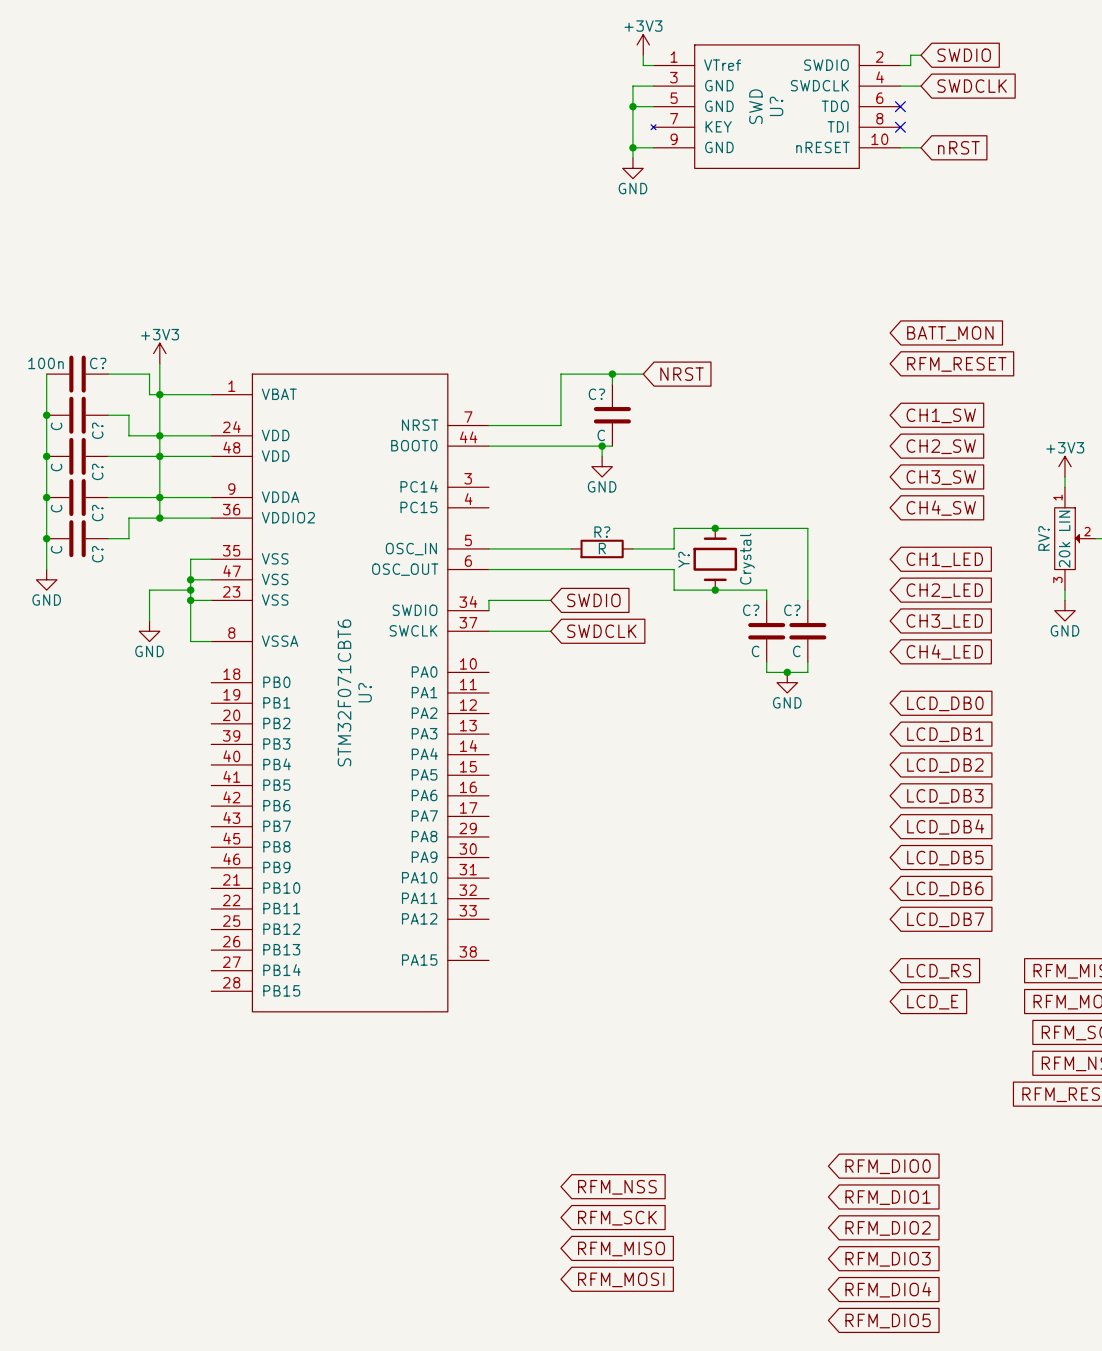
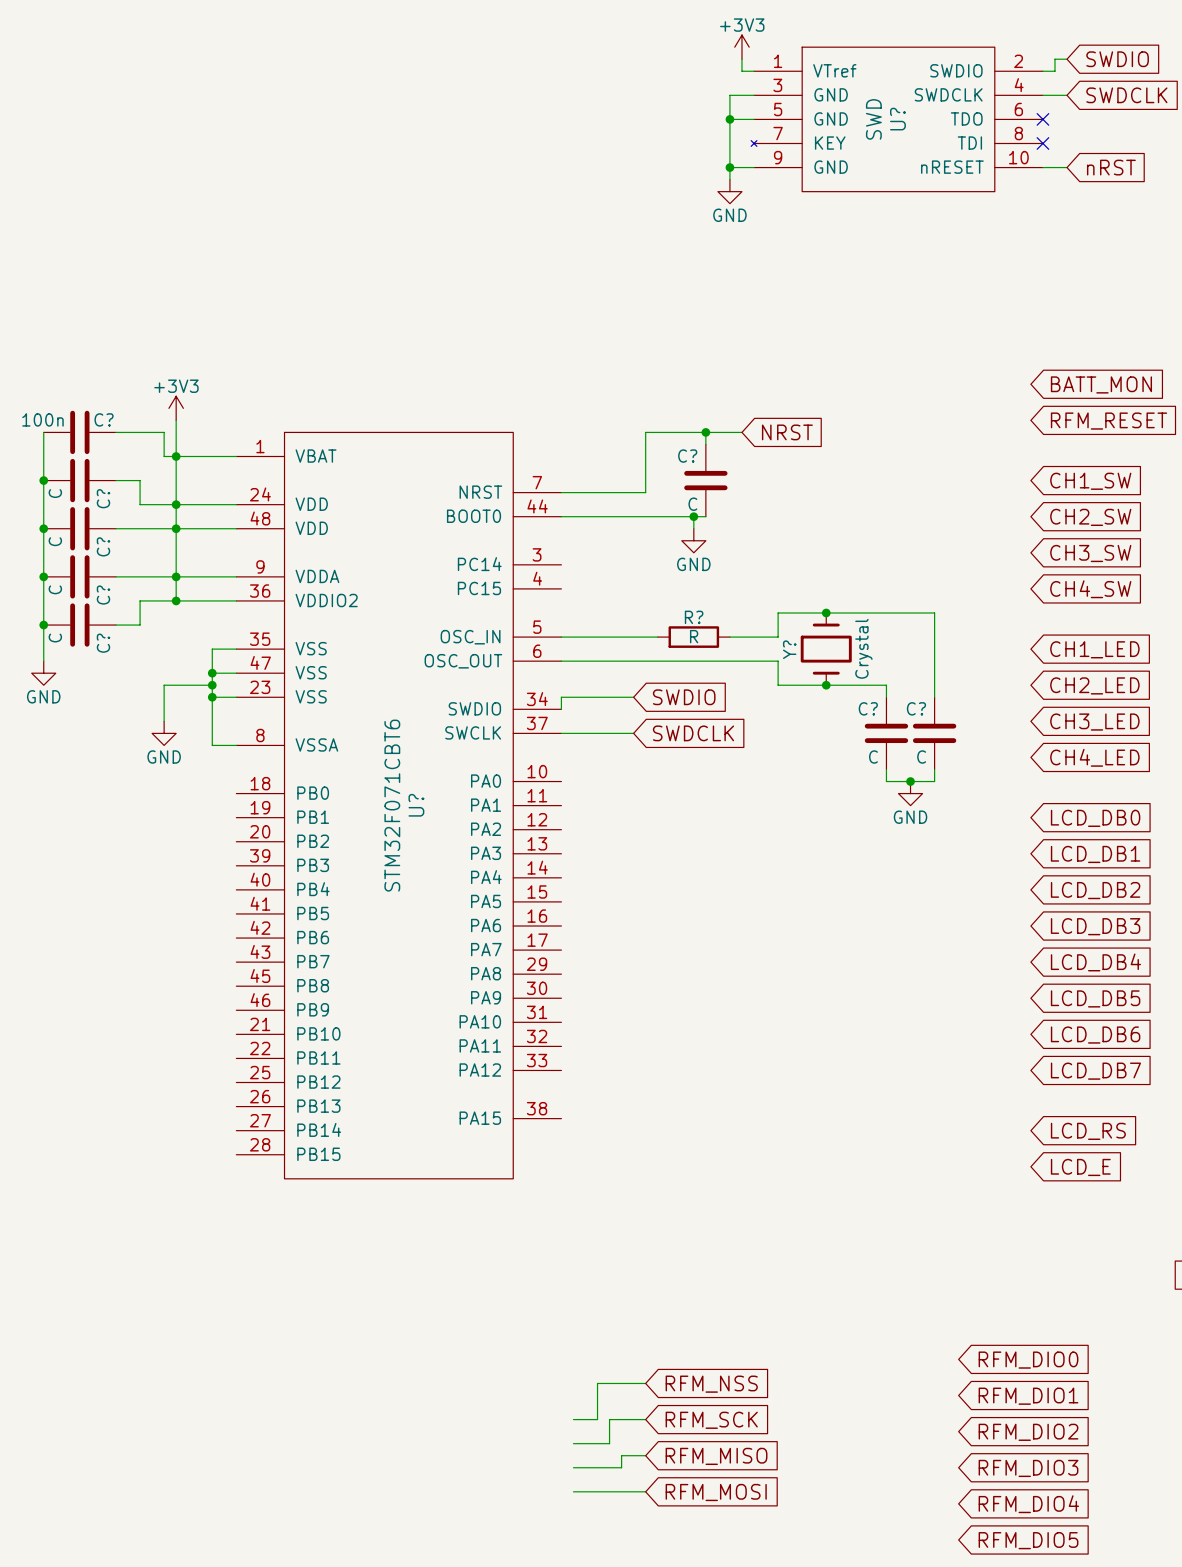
wire: none -> (645, 1383) (597, 1383) (597, 1419) (573, 1419)
wire: none -> (645, 1419) (609, 1419) (609, 1443) (573, 1443)
wire: none -> (645, 1455) (621, 1455) (621, 1467) (573, 1467)
wire: none -> (573, 1491) (645, 1491)

